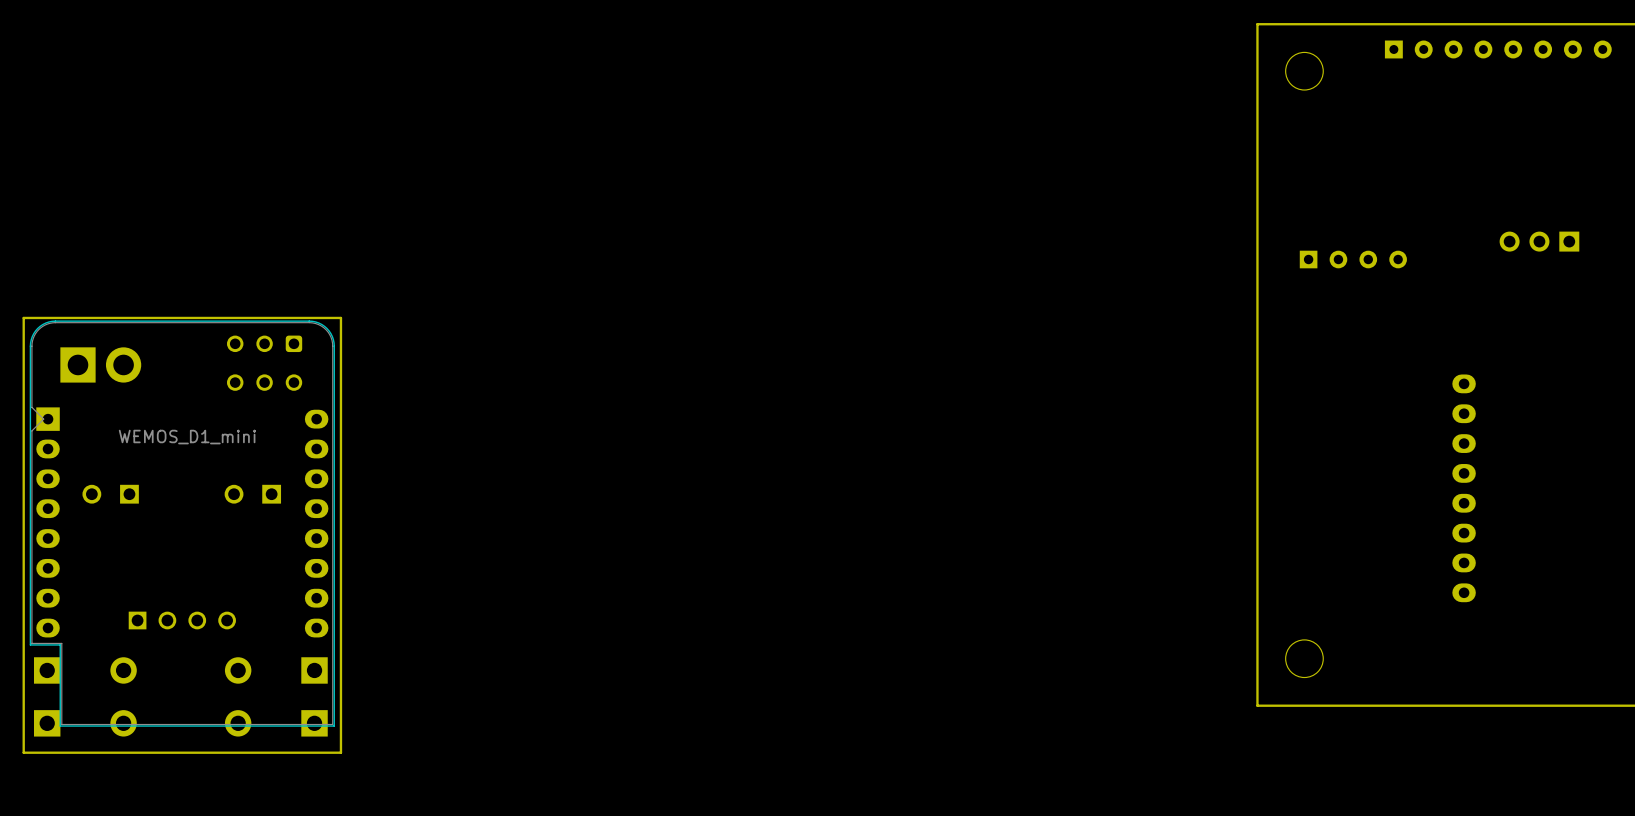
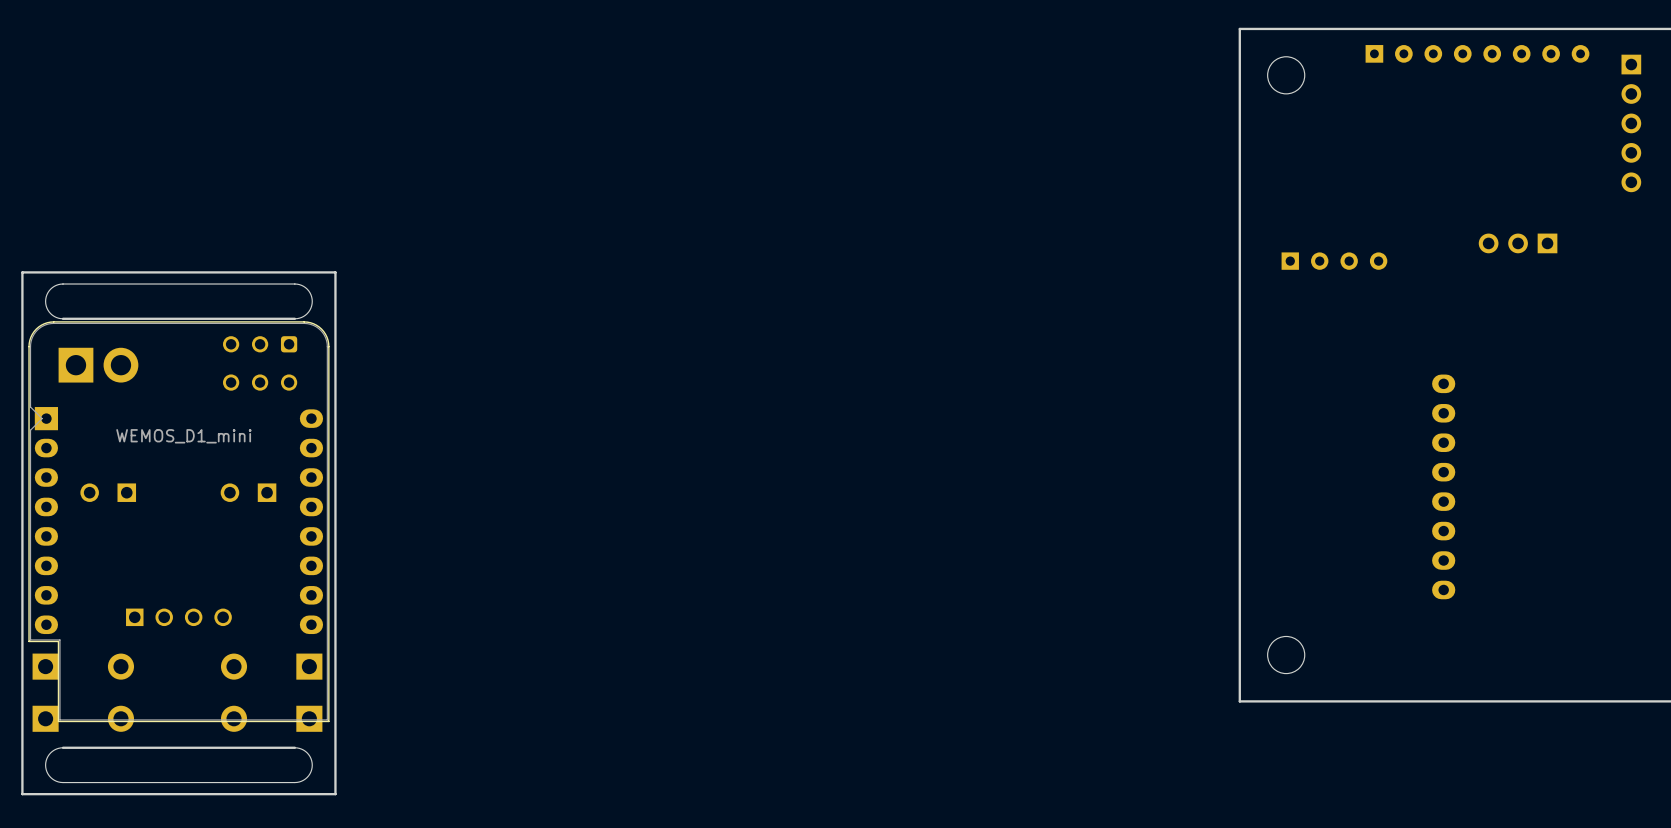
board edge: (64, 317) (23, 317) -> (62, 318) (50, 313) (45, 301) (50, 289) (62, 284) (297, 284) (308, 290) (312, 303) (307, 313) (294, 318)
board edge: (340, 317) (299, 317) -> (335, 318) (335, 272) (22, 272) (22, 318)
board edge: (64, 752) (23, 752) -> (62, 747) (50, 752) (45, 765) (50, 777) (62, 782) (297, 782) (308, 775) (312, 762) (307, 752) (294, 747)
board edge: (340, 752) (299, 752) -> (335, 747) (335, 794) (22, 794) (22, 747)

